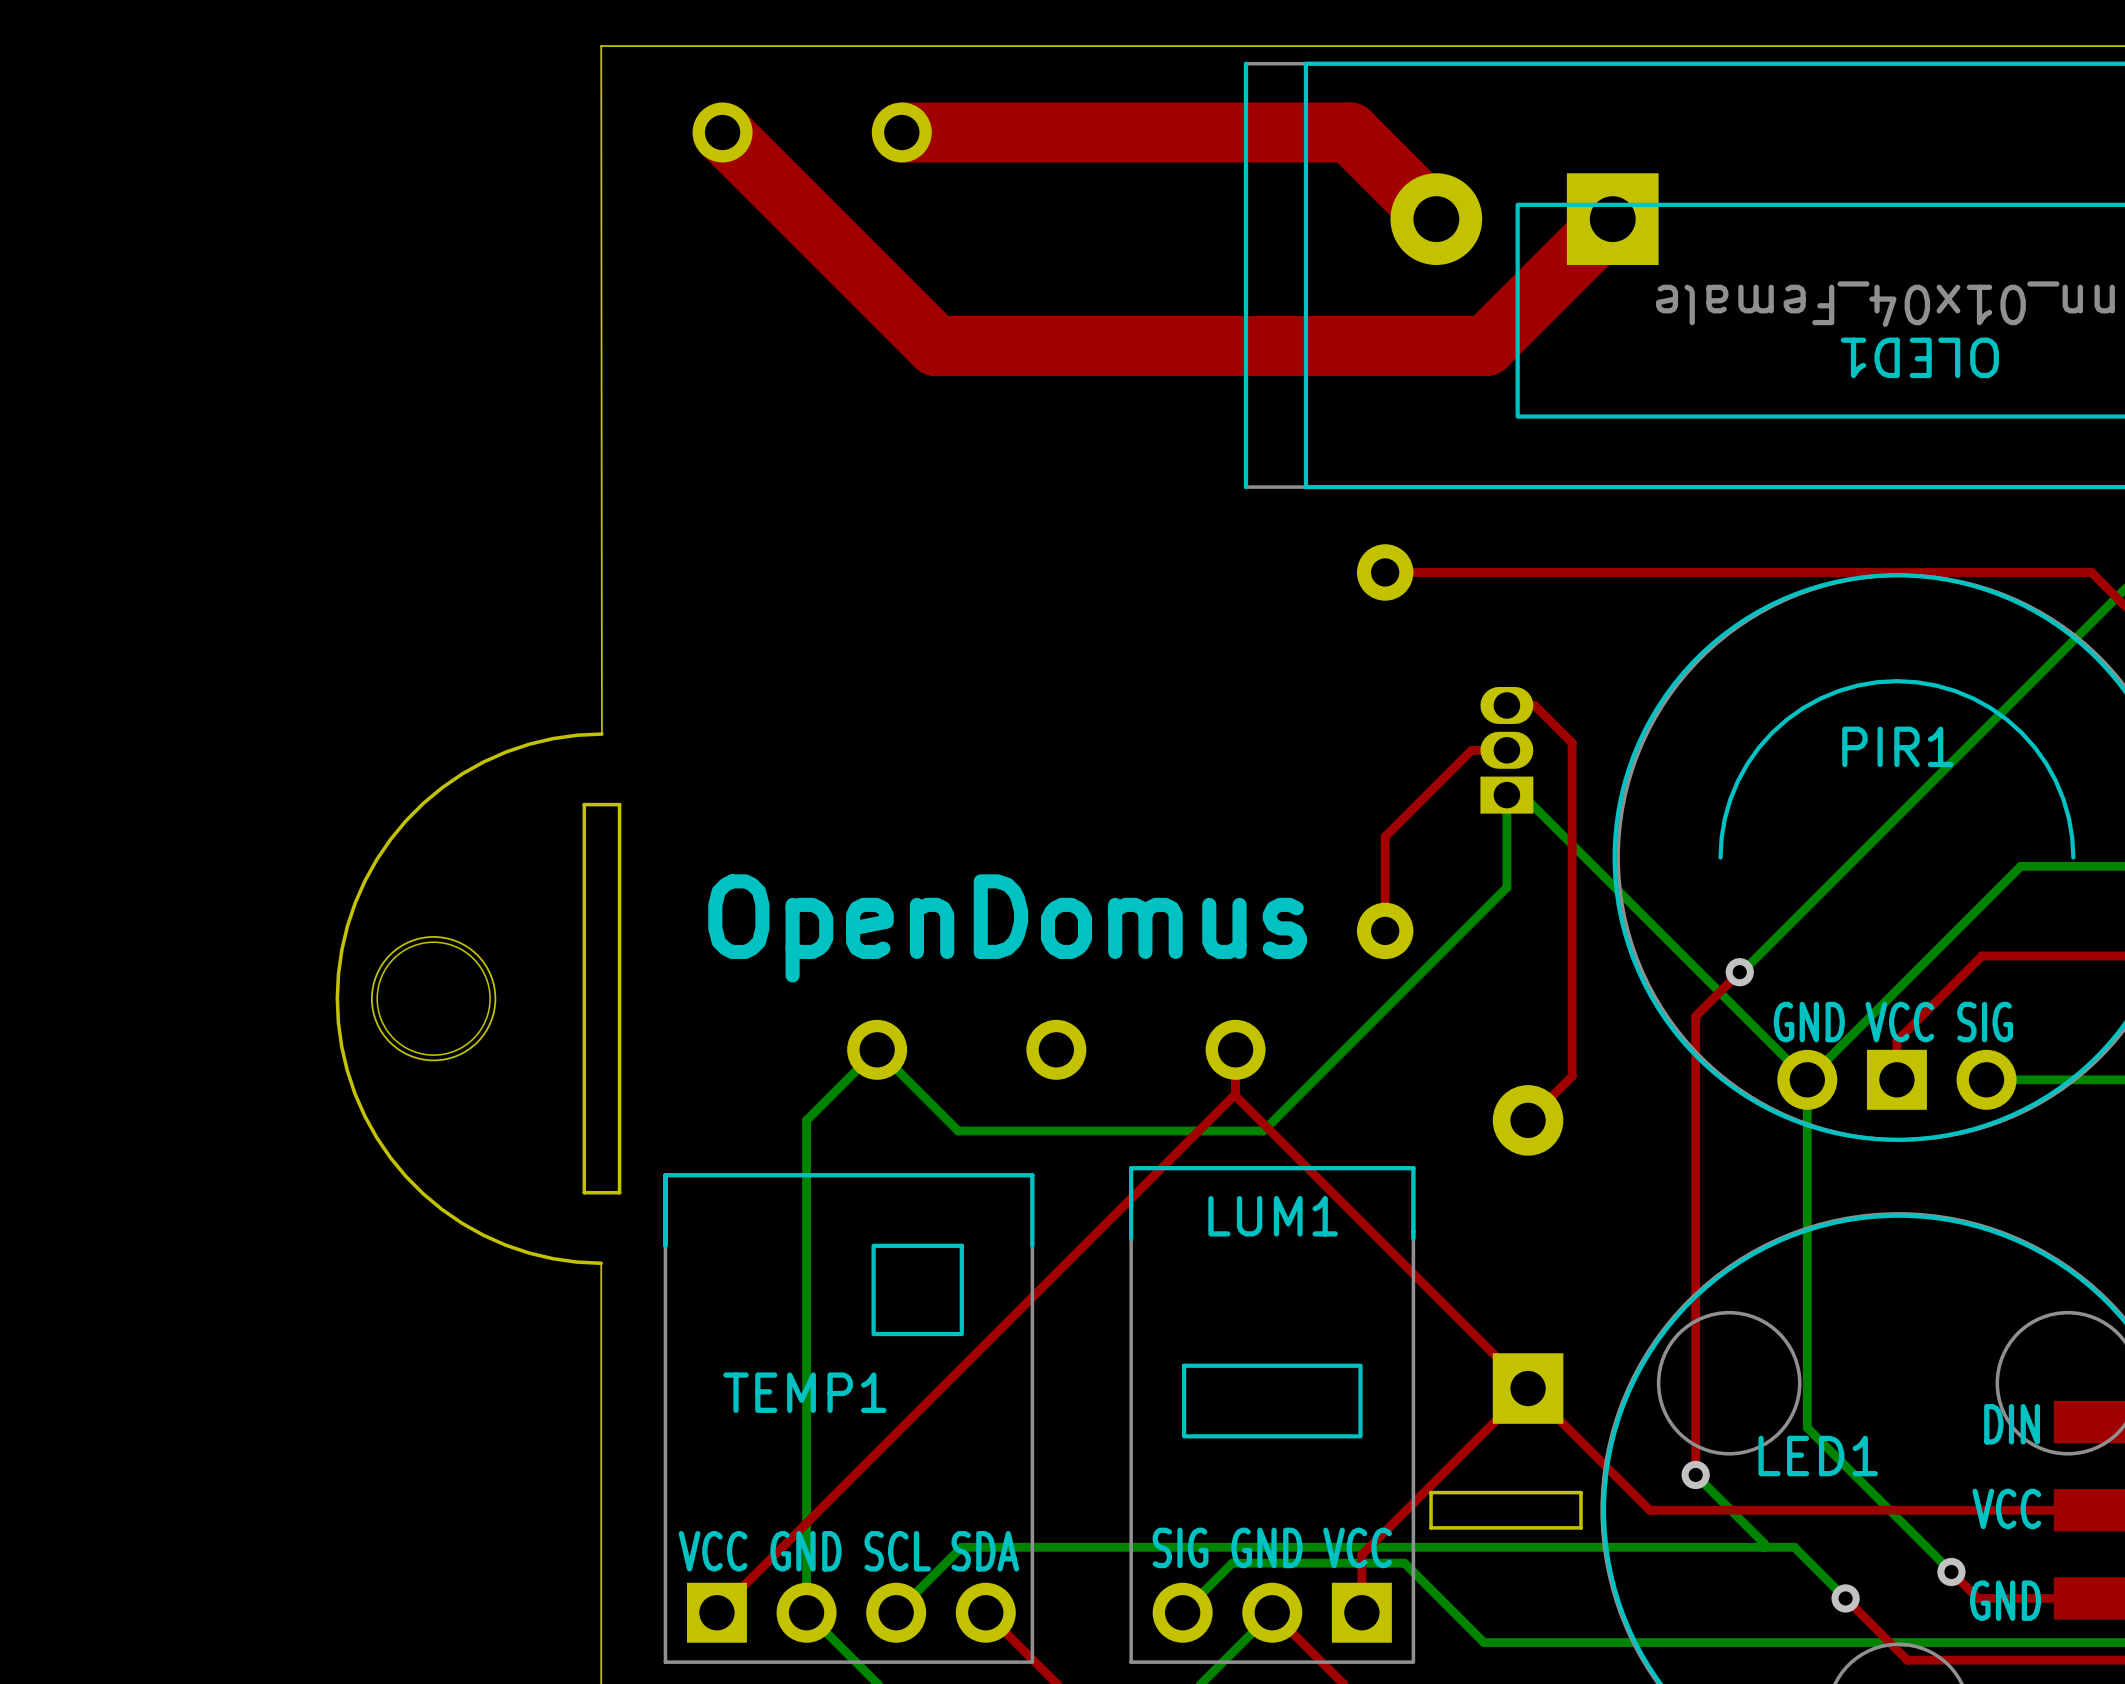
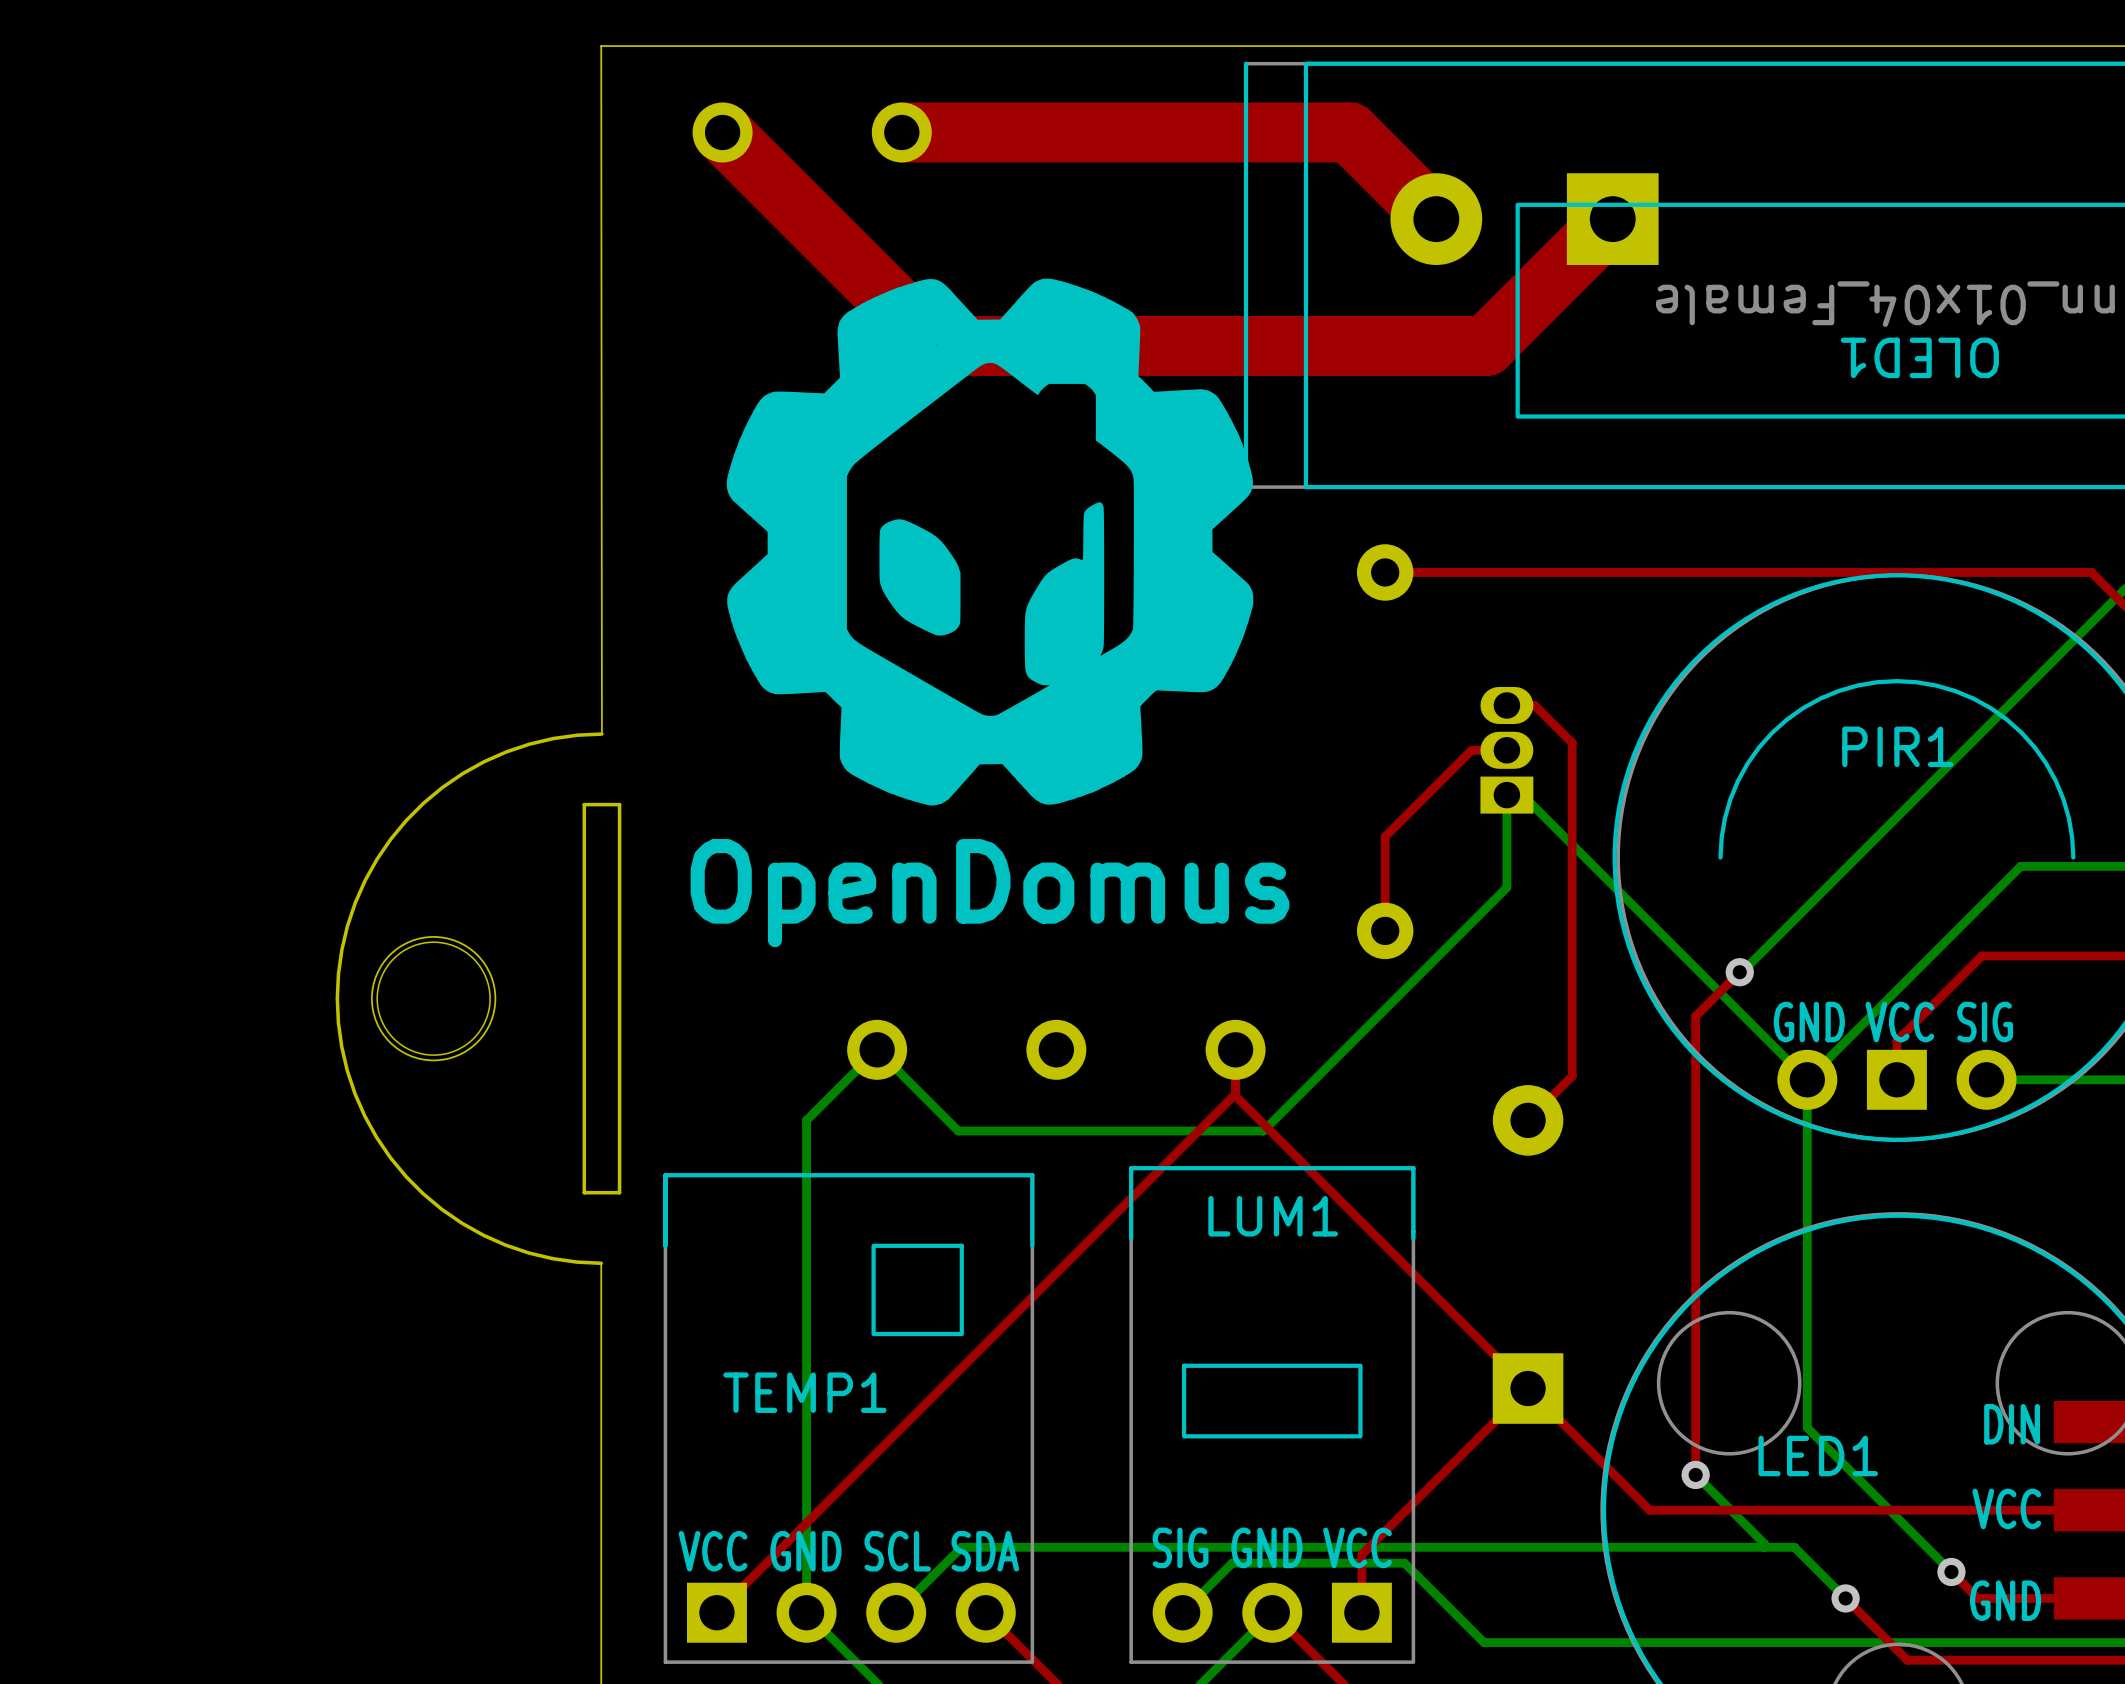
drawing: none -> [726, 278, 1254, 806]
text position: OpenDomus (1007, 928) -> OpenDomus (990, 893)
board edge: (1431, 1492) (1580, 1492) (1580, 1527) (1431, 1527) (1431, 1492) -> none

